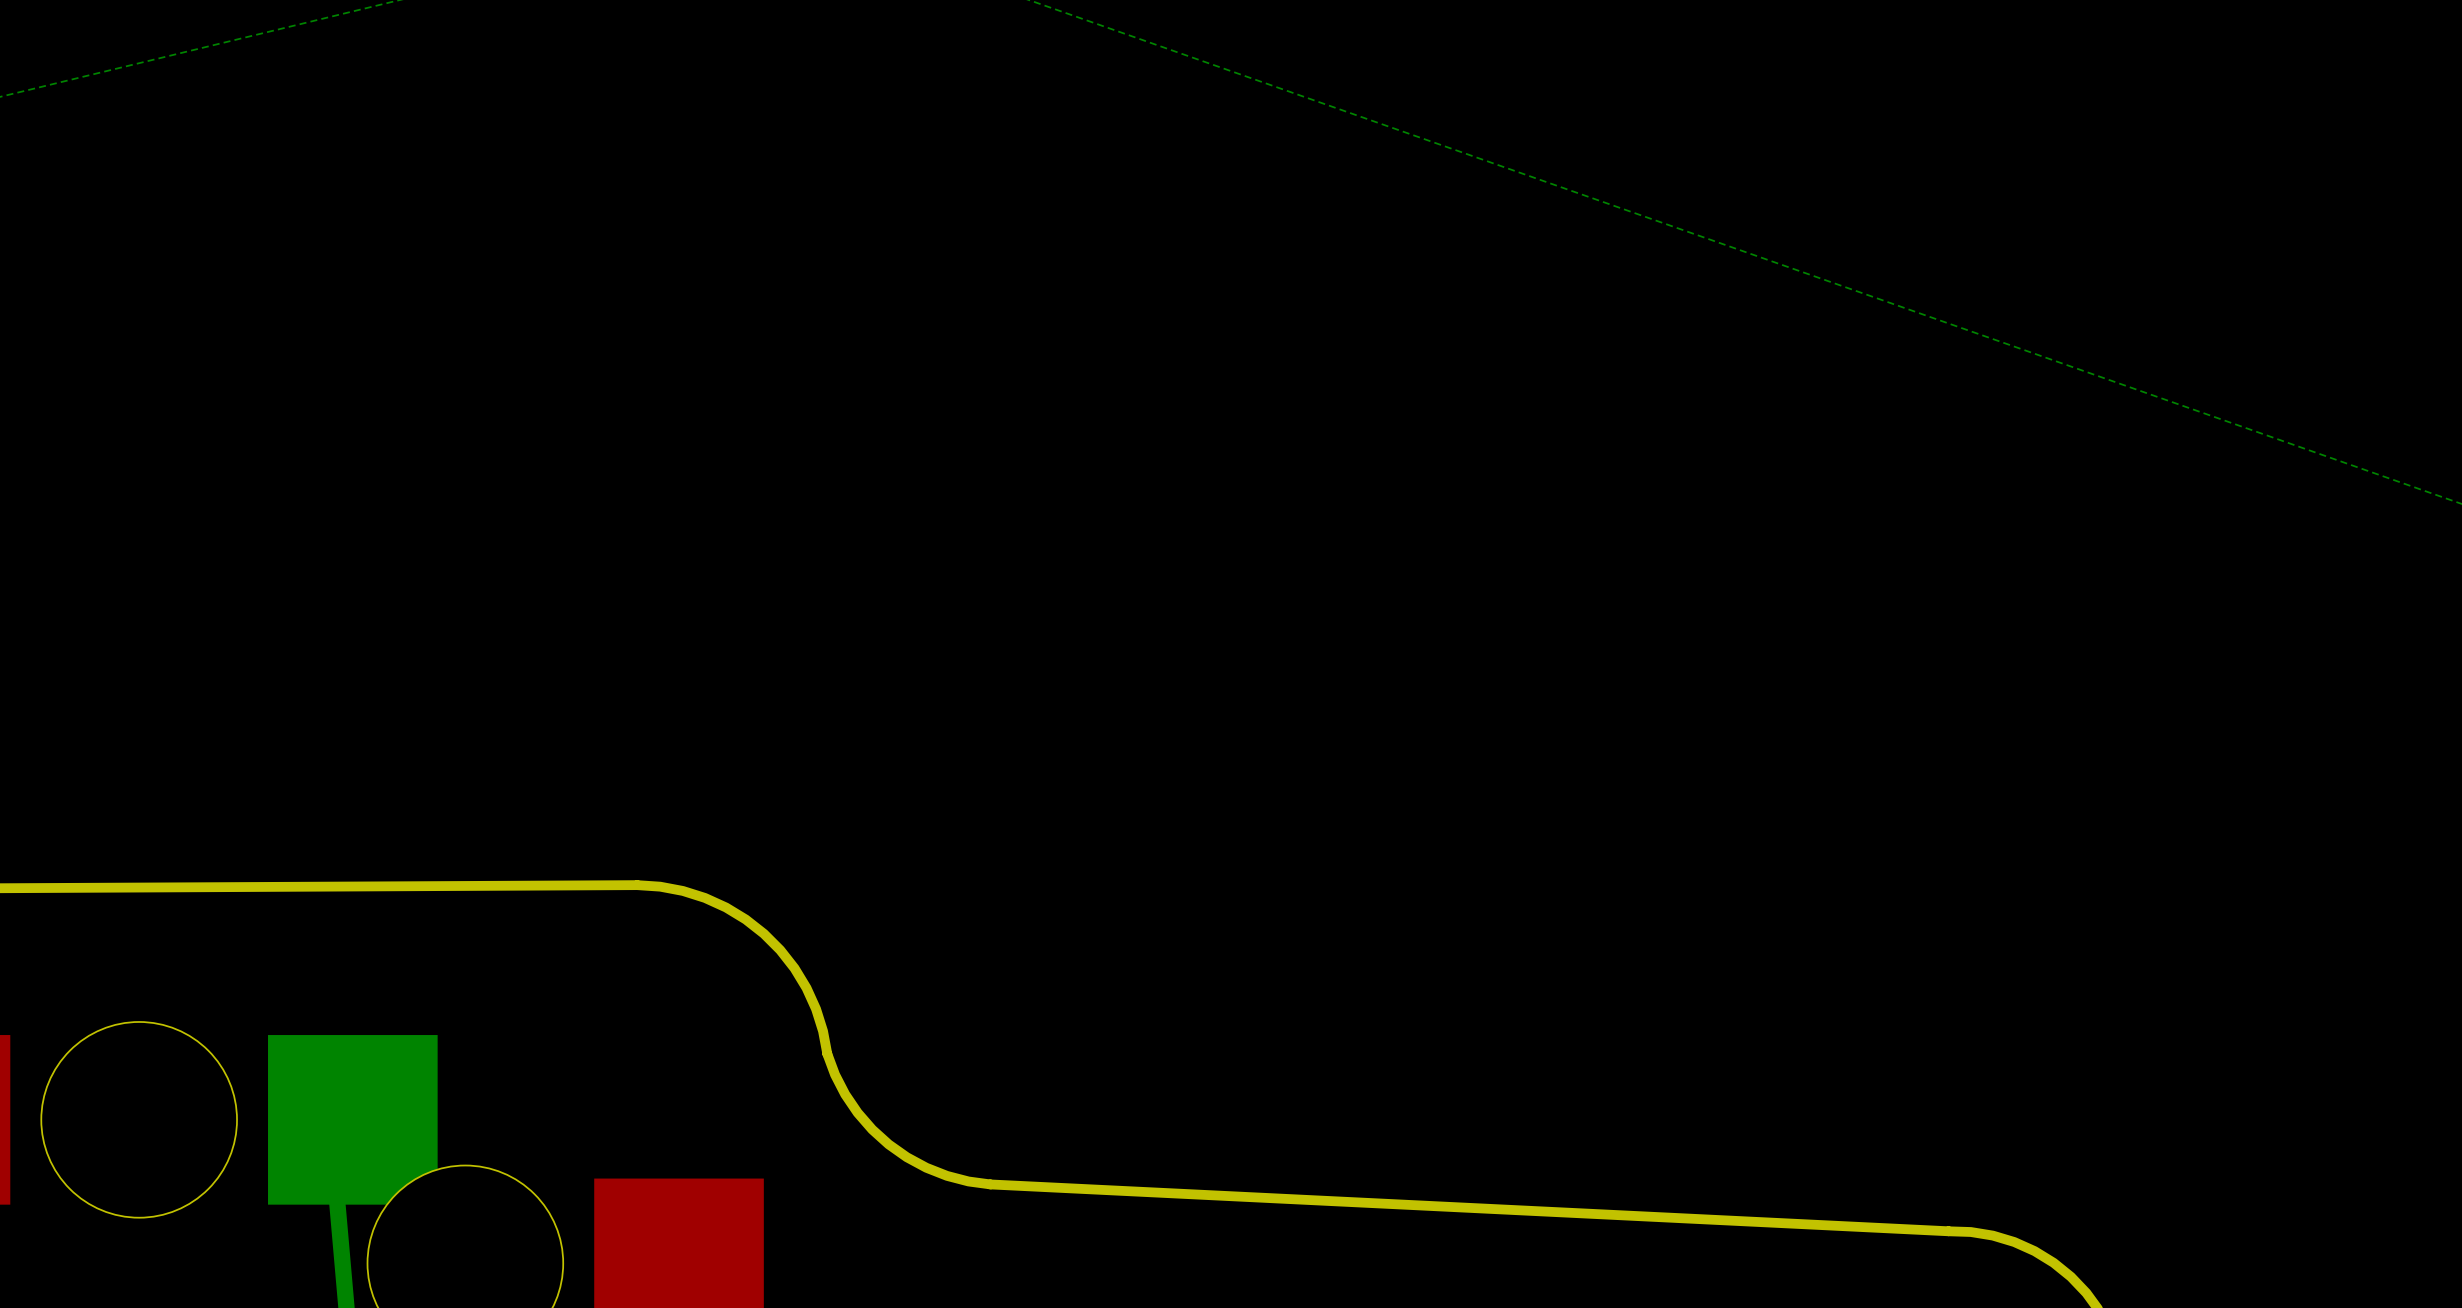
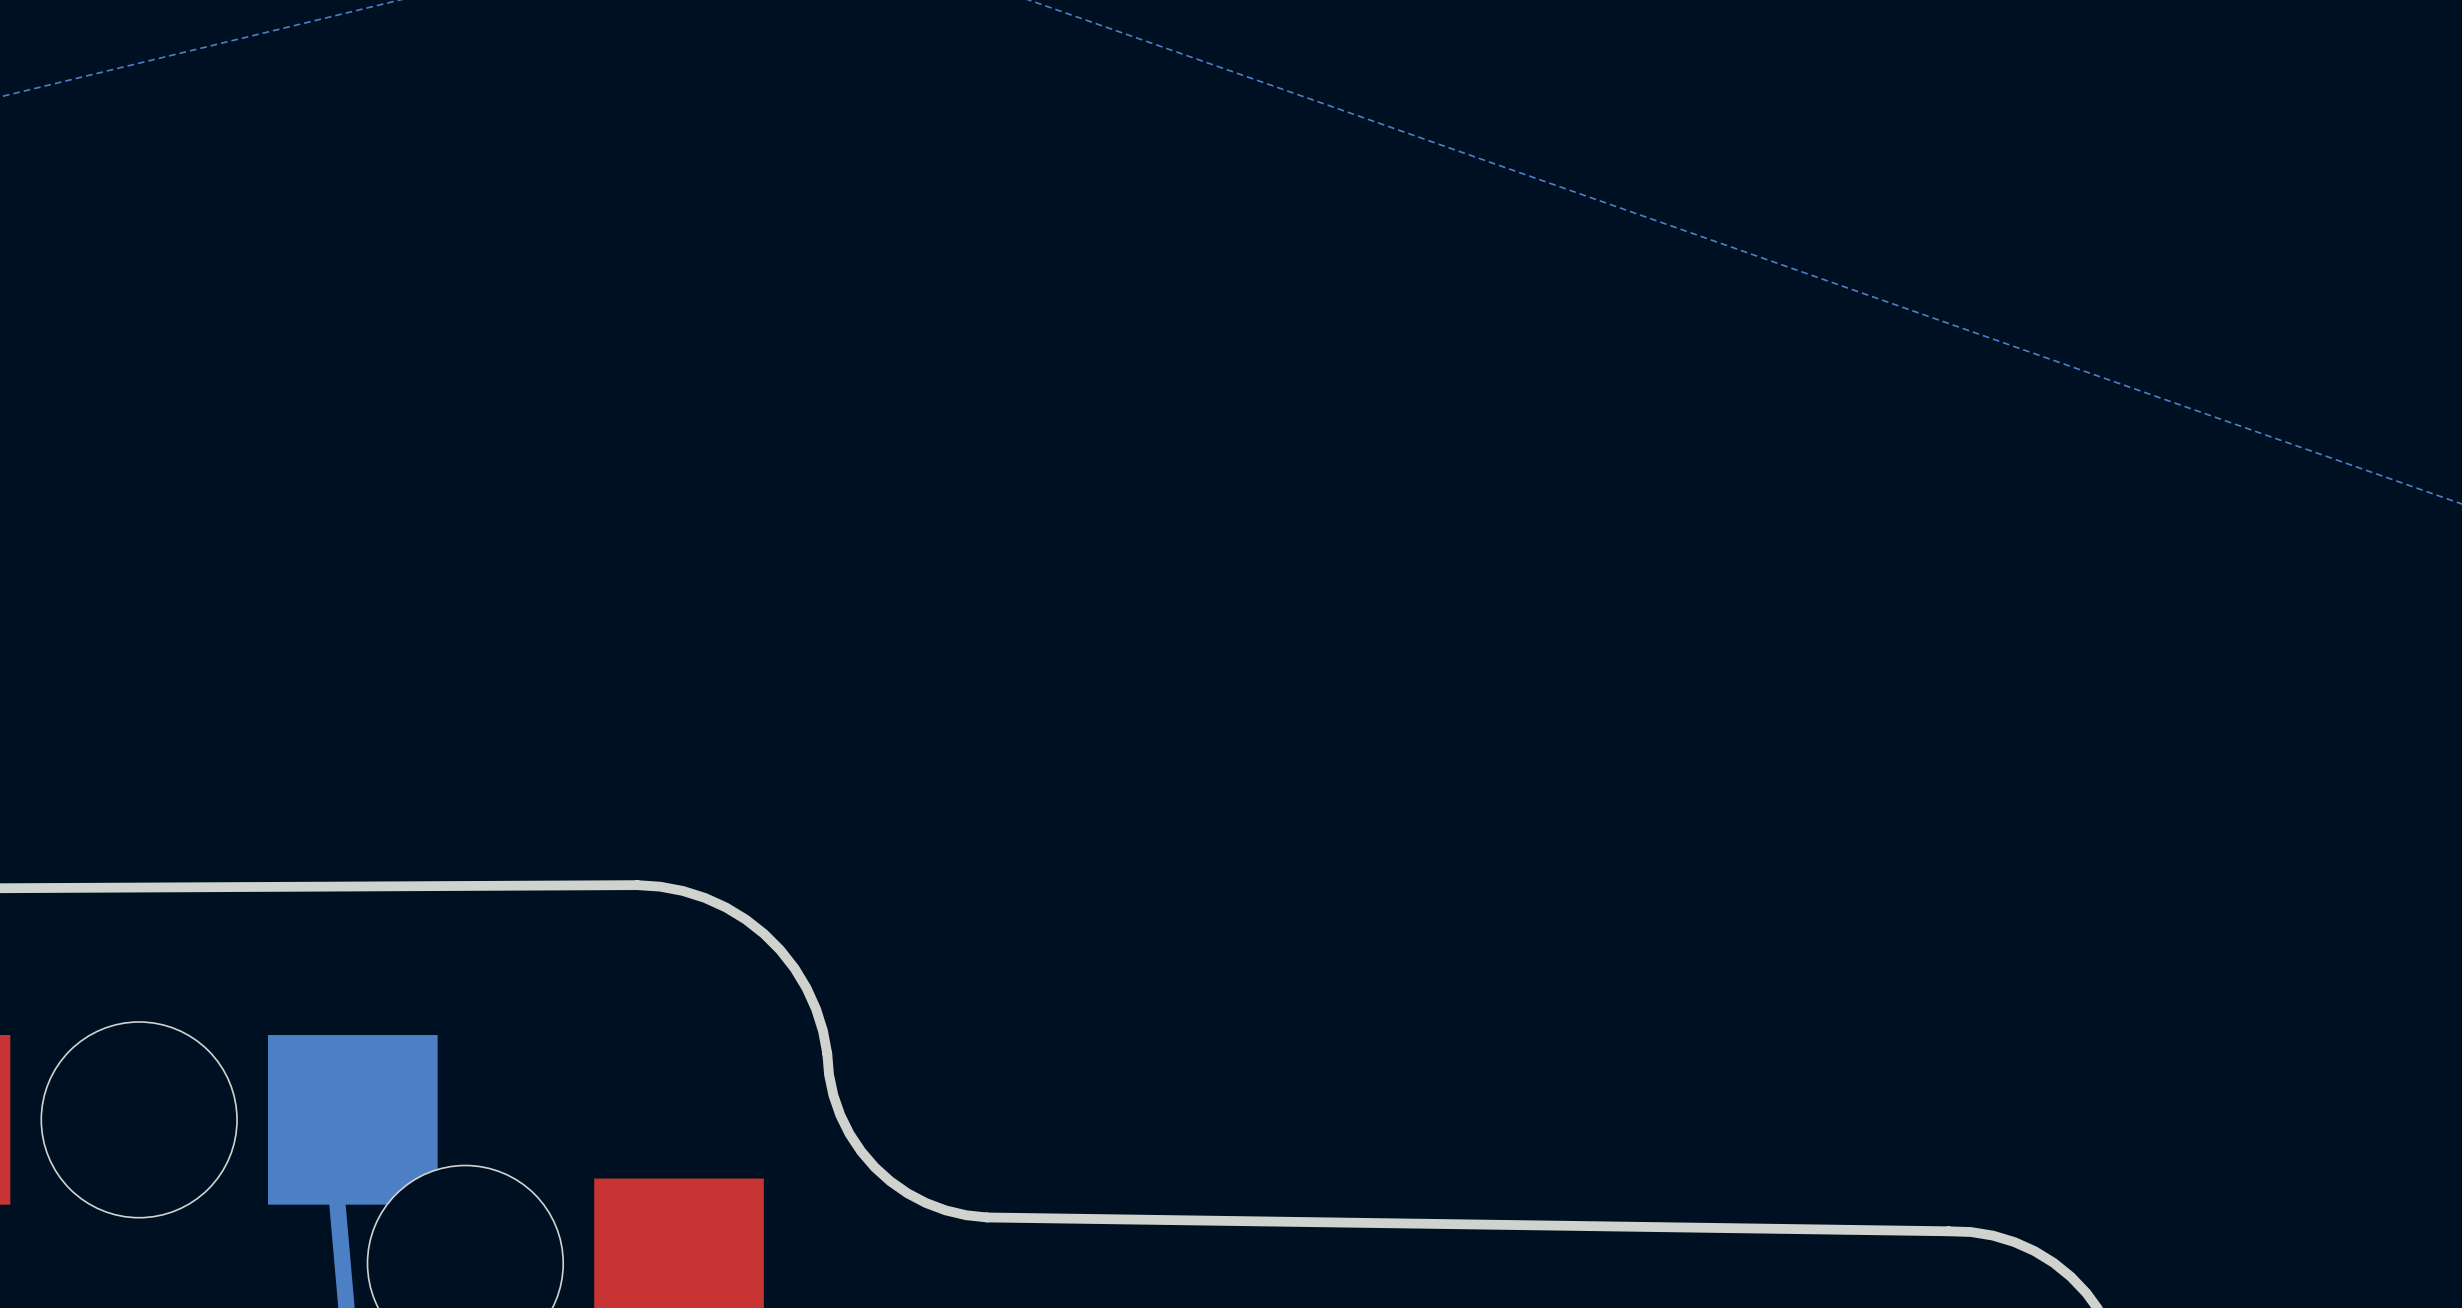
board edge: (827, 1053) (845, 1094) (872, 1129) (906, 1157) (947, 1175) (968, 1181) (990, 1184) (1948, 1231) -> (827, 1053) (833, 1095) (840, 1115) (861, 1151) (874, 1167) (907, 1193) (926, 1203) (966, 1215) (987, 1217) (1948, 1231)

